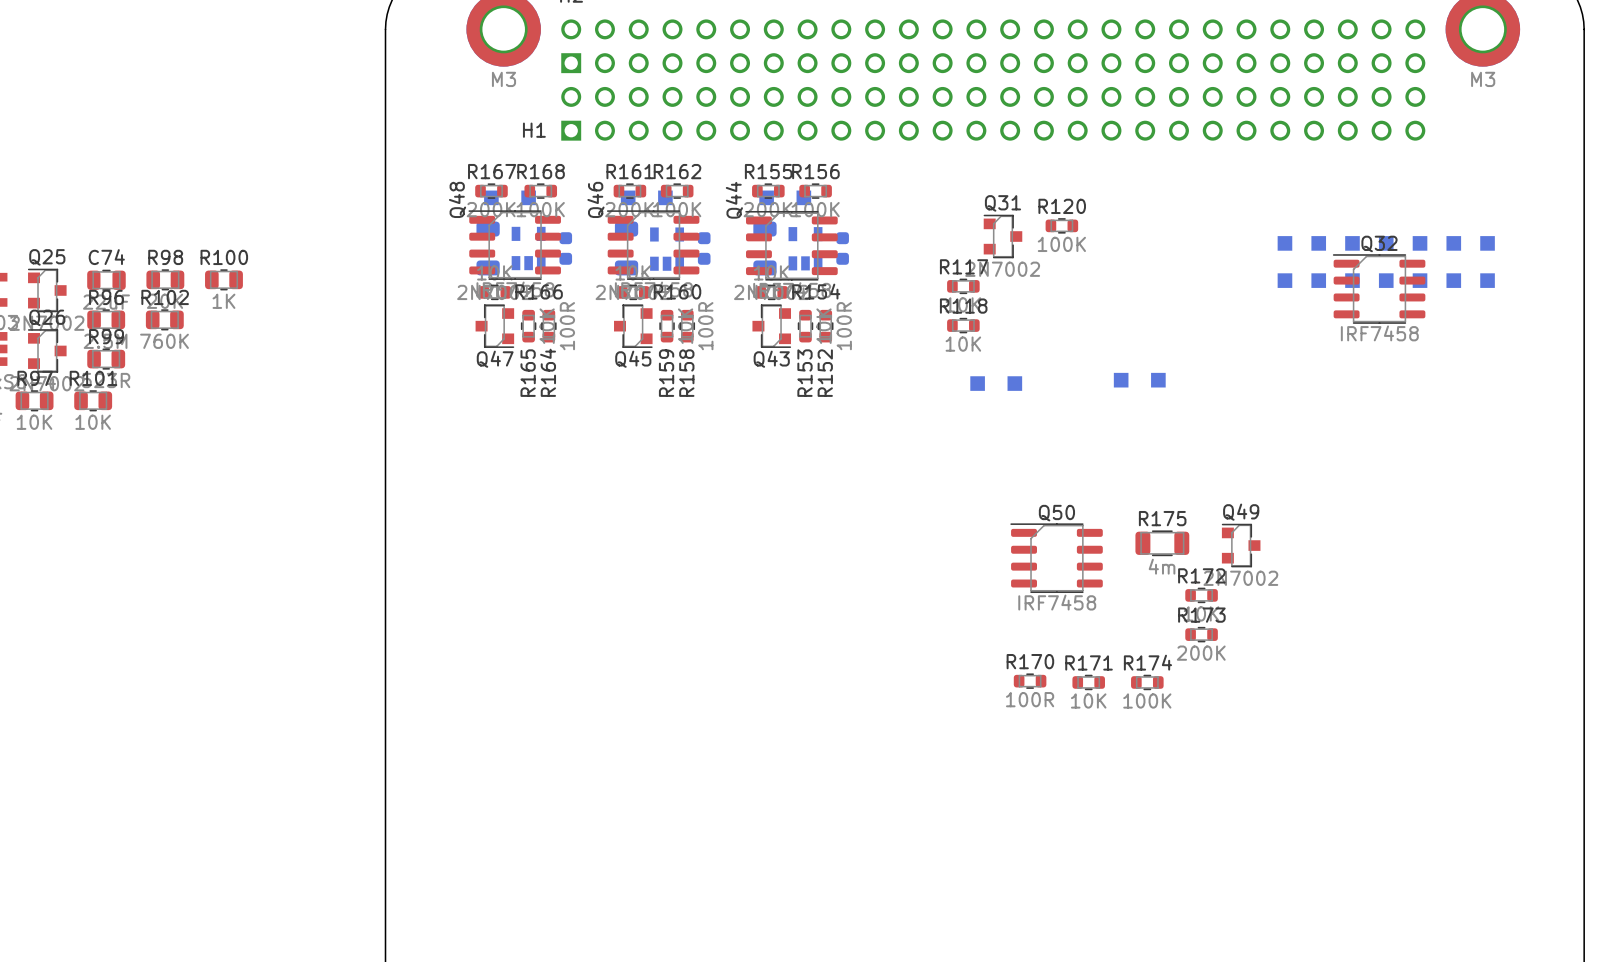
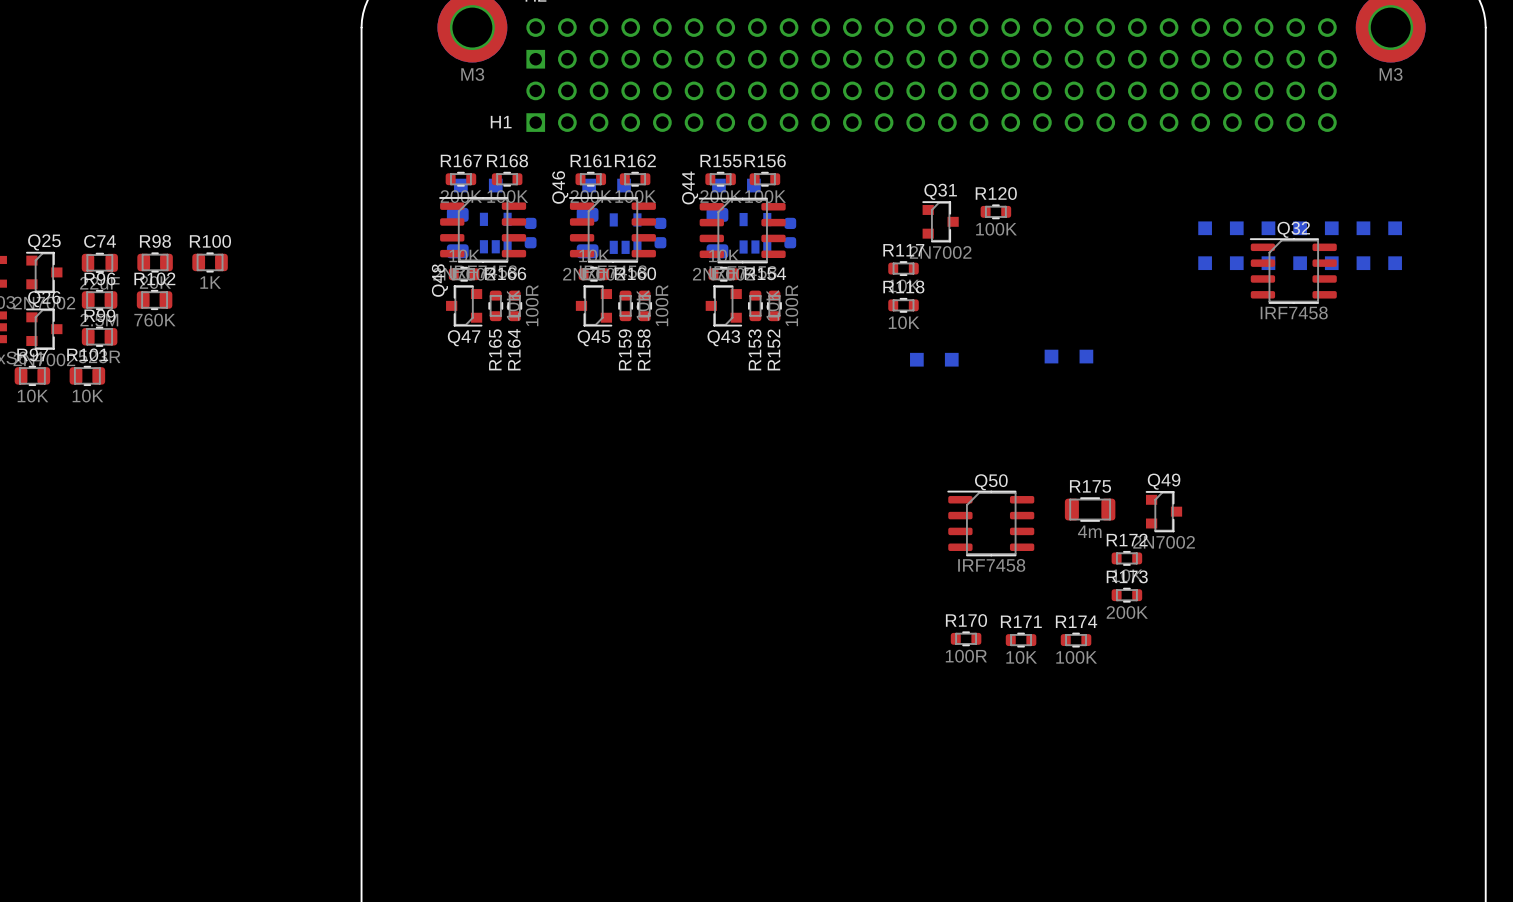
Q48 name position: Q48 (457, 199) -> Q48 (439, 280)

